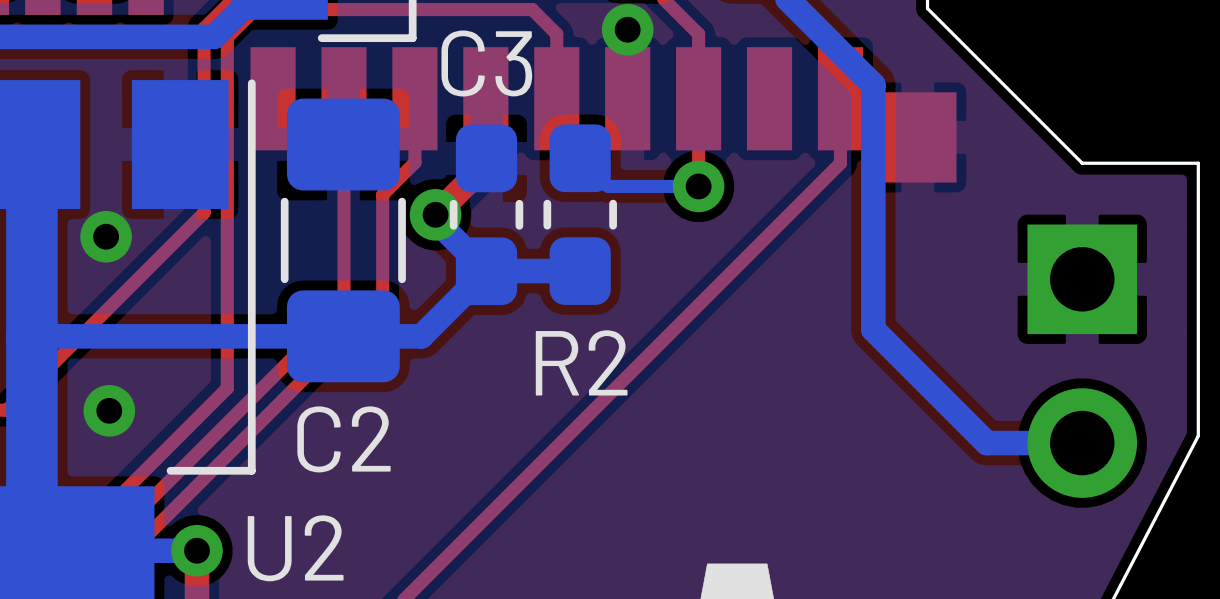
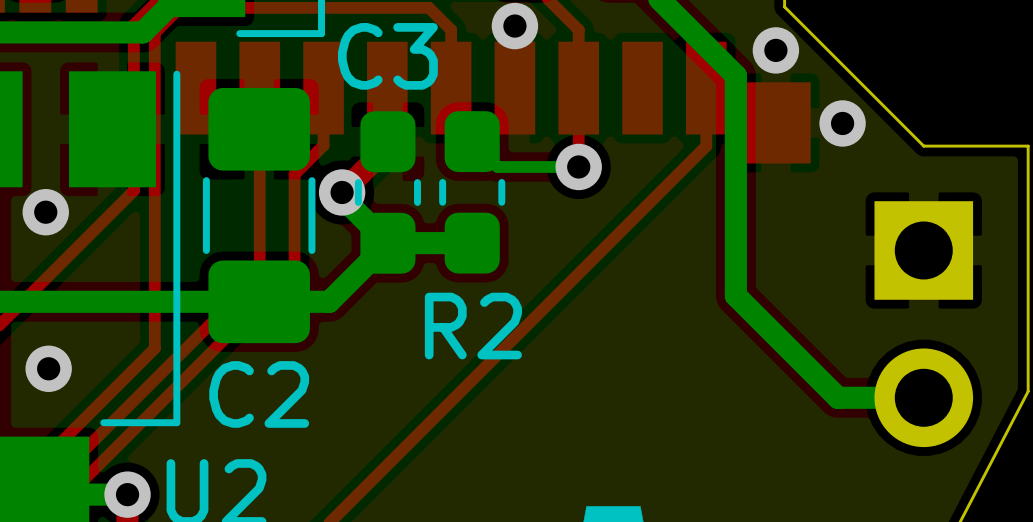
via: none -> (775, 50)
via: none -> (842, 123)

